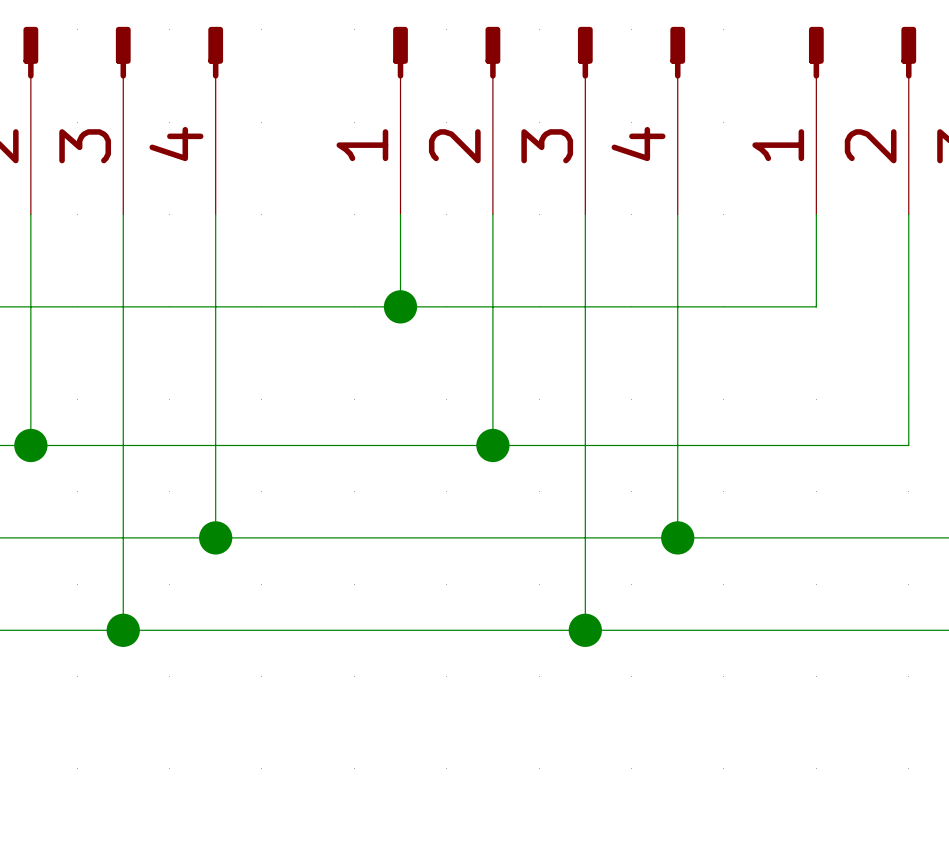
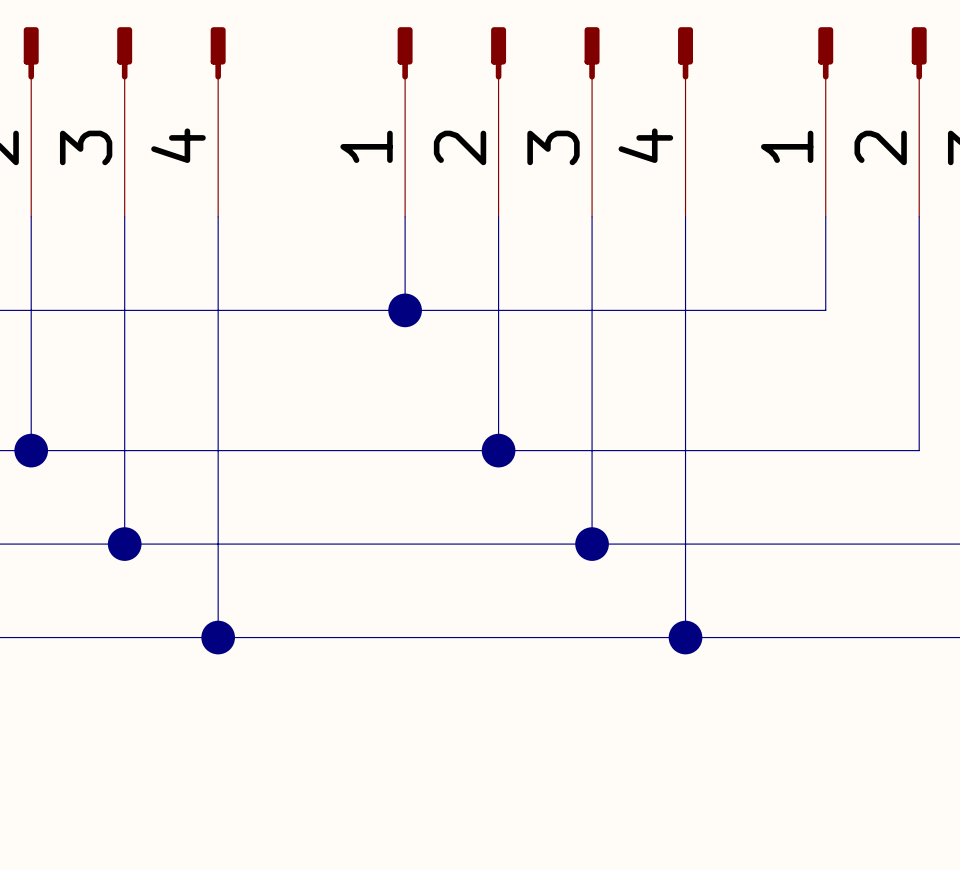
wire: (123, 537) (123, 630) -> (218, 544) (218, 637)
junction: none -> (124, 544)
junction: (215, 537) -> none
wire: (585, 537) (585, 630) -> (685, 544) (685, 637)
junction: none -> (592, 544)
junction: (677, 537) -> none
junction: (123, 630) -> none
junction: none -> (218, 637)
junction: (585, 630) -> none
junction: none -> (685, 637)

